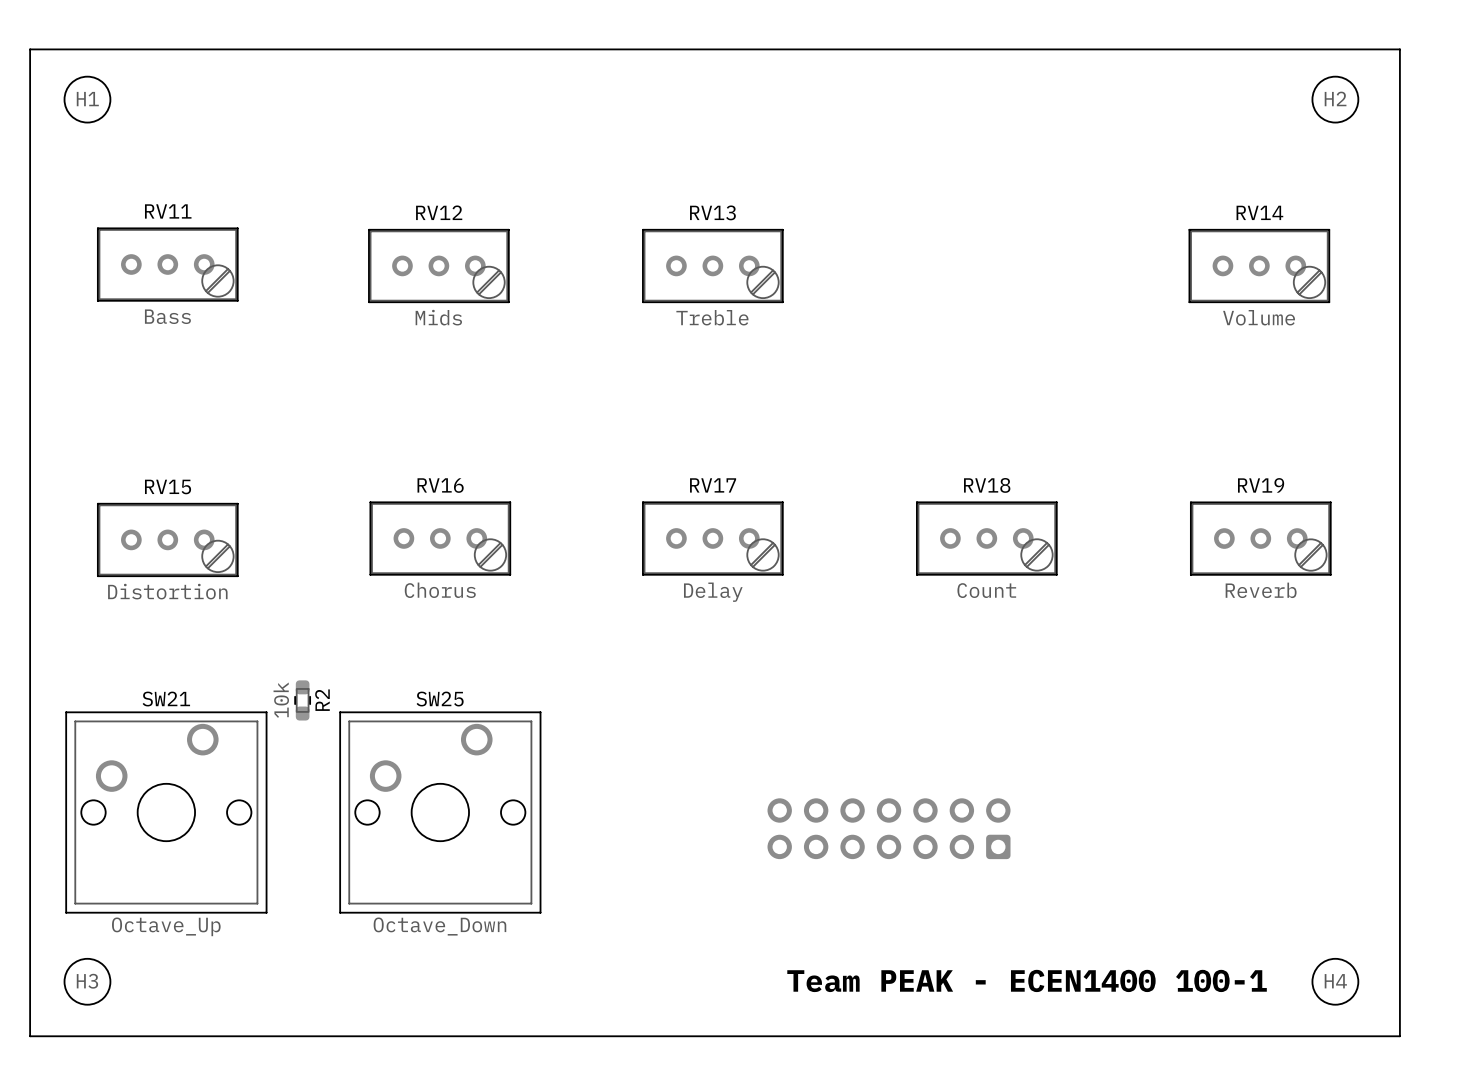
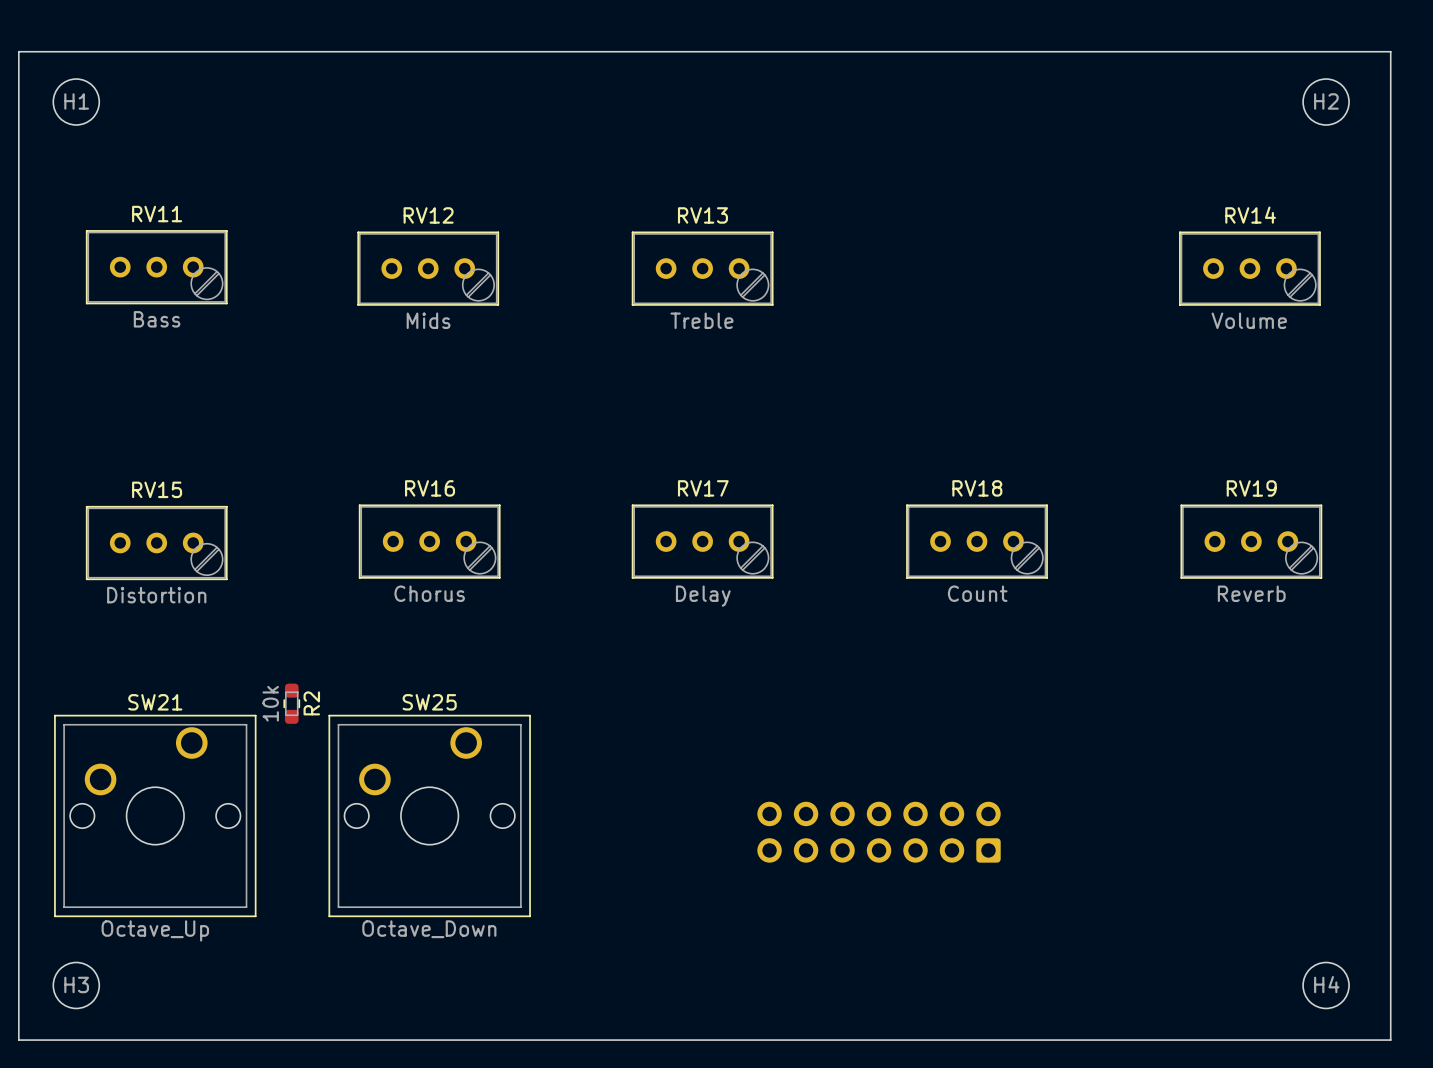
text: Team PEAK - ECEN1400 100-1 (1027, 980) -> none

